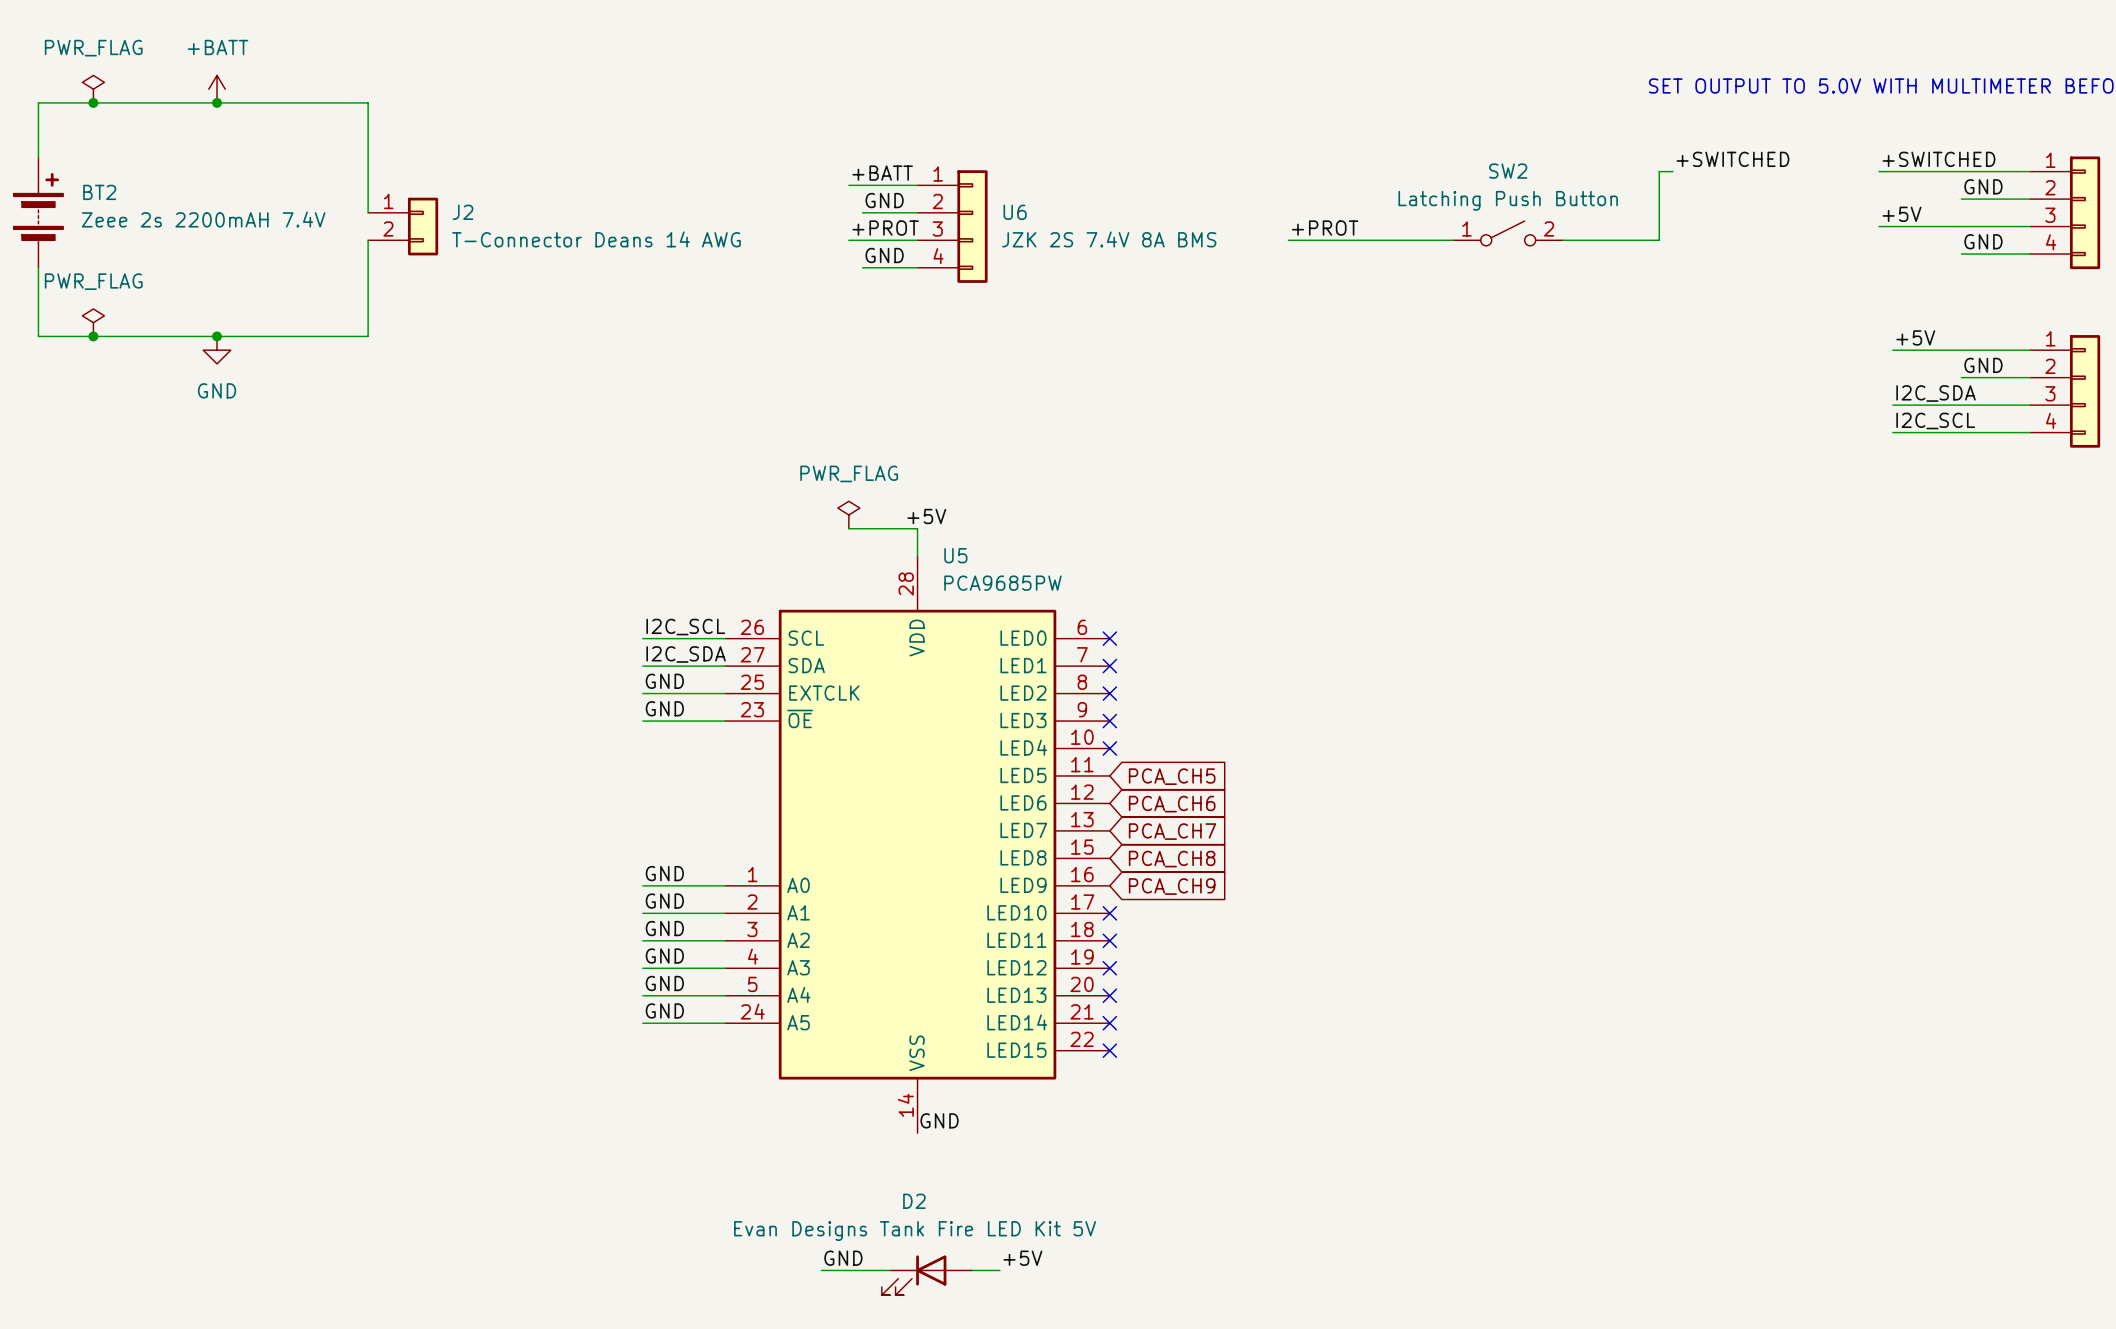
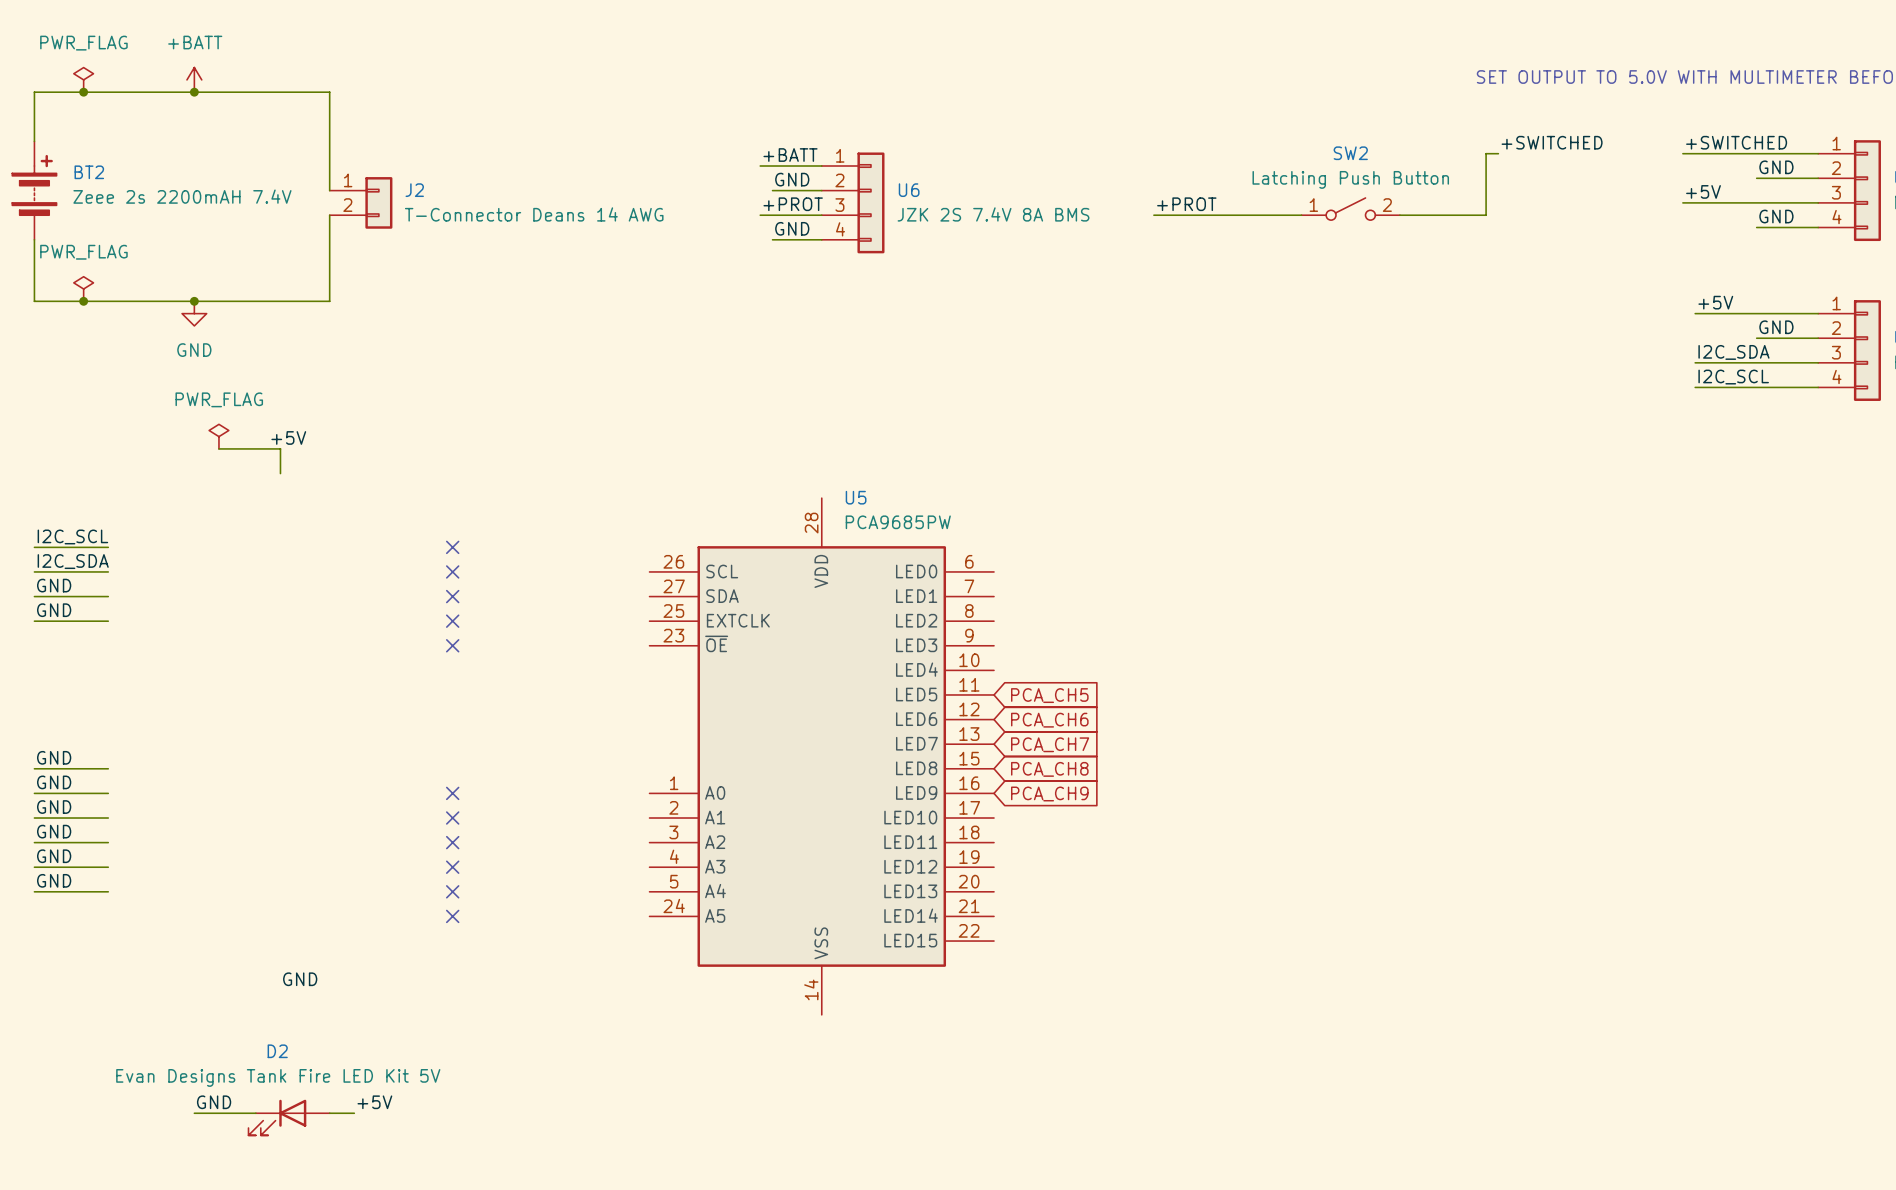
power symbol: none -> PWR_FLAG (218, 436)
label: none -> +5V (288, 437)
wire: none -> (218, 448) (280, 448) (280, 473)
power symbol: PWR_FLAG (848, 515) -> none
label: +5V (926, 516) -> none
wire: (848, 528) (917, 528) (917, 556) -> none
label: none -> I2C_SCL (72, 536)
wire: none -> (34, 547) (108, 547)
no-connect mark: none -> (452, 547)
label: none -> I2C_SDA (73, 561)
label: I2C_SCL (685, 627) -> none
wire: none -> (34, 571) (108, 571)
no-connect mark: none -> (452, 571)
wire: (642, 638) (725, 638) -> none
no-connect mark: (1109, 638) -> none
label: none -> GND (54, 585)
label: I2C_SDA (686, 654) -> none
wire: none -> (34, 596) (108, 596)
no-connect mark: none -> (452, 596)
wire: (642, 666) (725, 666) -> none
no-connect mark: (1109, 666) -> none
label: none -> GND (54, 610)
label: GND (664, 681) -> none
wire: none -> (34, 621) (108, 621)
no-connect mark: none -> (452, 621)
wire: (642, 693) (725, 693) -> none
no-connect mark: (1109, 693) -> none
label: GND (664, 708) -> none
no-connect mark: none -> (452, 645)
wire: (642, 721) (725, 721) -> none
no-connect mark: (1109, 721) -> none
no-connect mark: (1109, 748) -> none
label: none -> GND (54, 757)
wire: none -> (34, 768) (108, 768)
label: none -> GND (54, 782)
label: GND (664, 873) -> none
wire: none -> (34, 793) (108, 793)
no-connect mark: none -> (452, 793)
wire: (642, 885) (725, 885) -> none
label: none -> GND (54, 807)
label: GND (664, 901) -> none
wire: none -> (34, 818) (108, 818)
no-connect mark: none -> (452, 818)
wire: (642, 913) (725, 913) -> none
no-connect mark: (1109, 913) -> none
label: none -> GND (54, 831)
label: GND (664, 928) -> none
wire: none -> (34, 842) (108, 842)
no-connect mark: none -> (452, 842)
wire: (642, 940) (725, 940) -> none
no-connect mark: (1109, 940) -> none
label: none -> GND (54, 856)
label: GND (664, 956) -> none
wire: none -> (34, 867) (108, 867)
no-connect mark: none -> (452, 867)
wire: (642, 968) (725, 968) -> none
no-connect mark: (1109, 968) -> none
label: none -> GND (54, 880)
label: GND (664, 983) -> none
wire: none -> (34, 891) (108, 891)
no-connect mark: none -> (452, 891)
wire: (642, 995) (725, 995) -> none
no-connect mark: (1109, 995) -> none
label: GND (664, 1010) -> none
no-connect mark: none -> (452, 916)
wire: (642, 1023) (725, 1023) -> none
no-connect mark: (1109, 1023) -> none
no-connect mark: (1109, 1050) -> none
label: none -> GND (300, 979)
label: GND (939, 1120) -> none
label: none -> GND (214, 1102)
label: none -> +5V (374, 1102)
wire: none -> (194, 1113) (255, 1113)
wire: none -> (329, 1113) (354, 1113)
label: GND (843, 1258) -> none
label: +5V (1022, 1258) -> none
wire: (821, 1270) (890, 1270) -> none
wire: (972, 1270) (999, 1270) -> none
D2 position: (927, 1275) -> (289, 1117)

